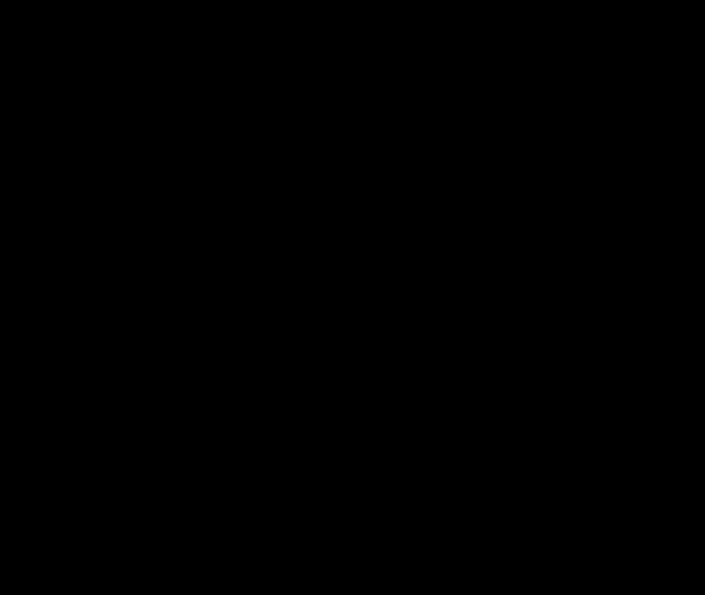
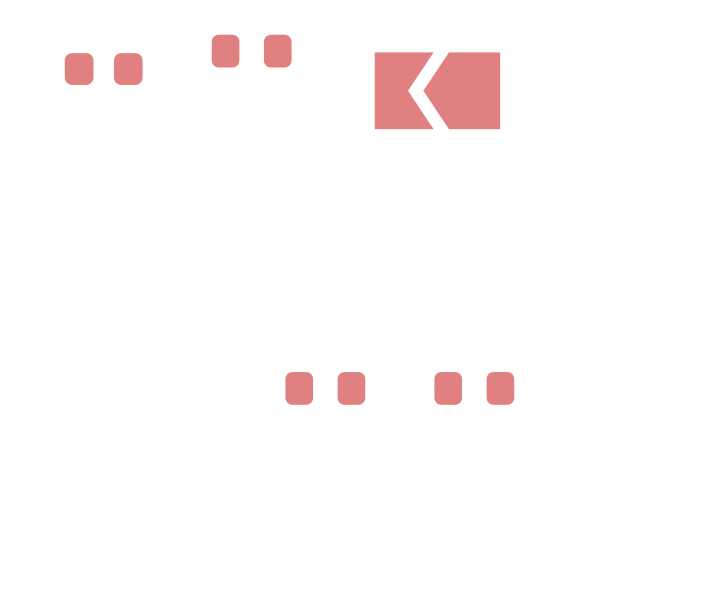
part: none -> (251, 51)
part: none -> (103, 69)
part: none -> (437, 90)
part: none -> (325, 388)
part: none -> (474, 388)

